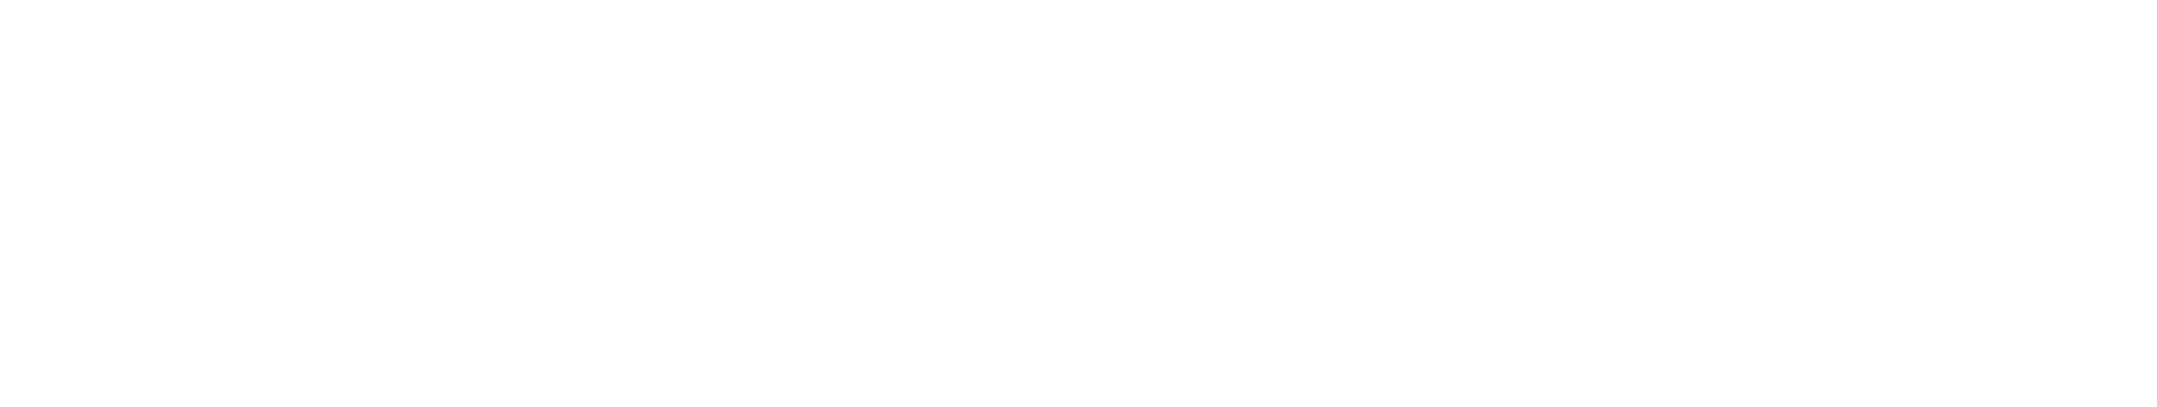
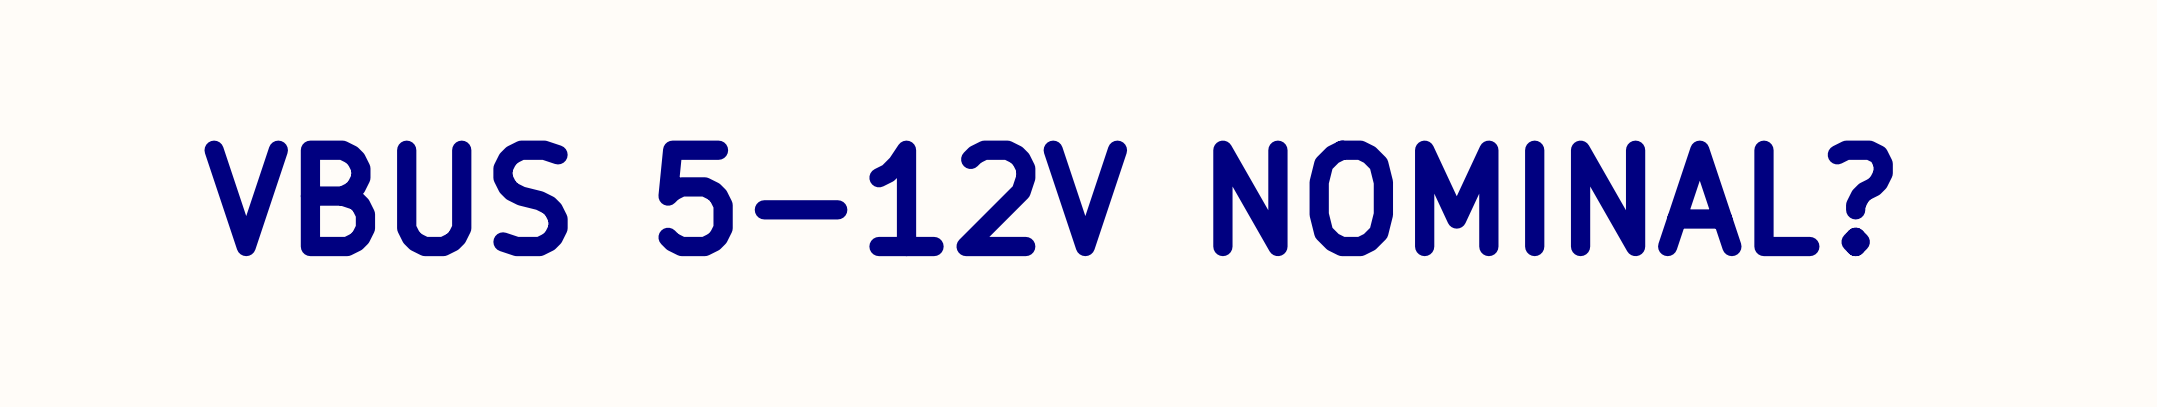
text: none -> VBUS 5-12V NOMINAL? (1048, 198)

